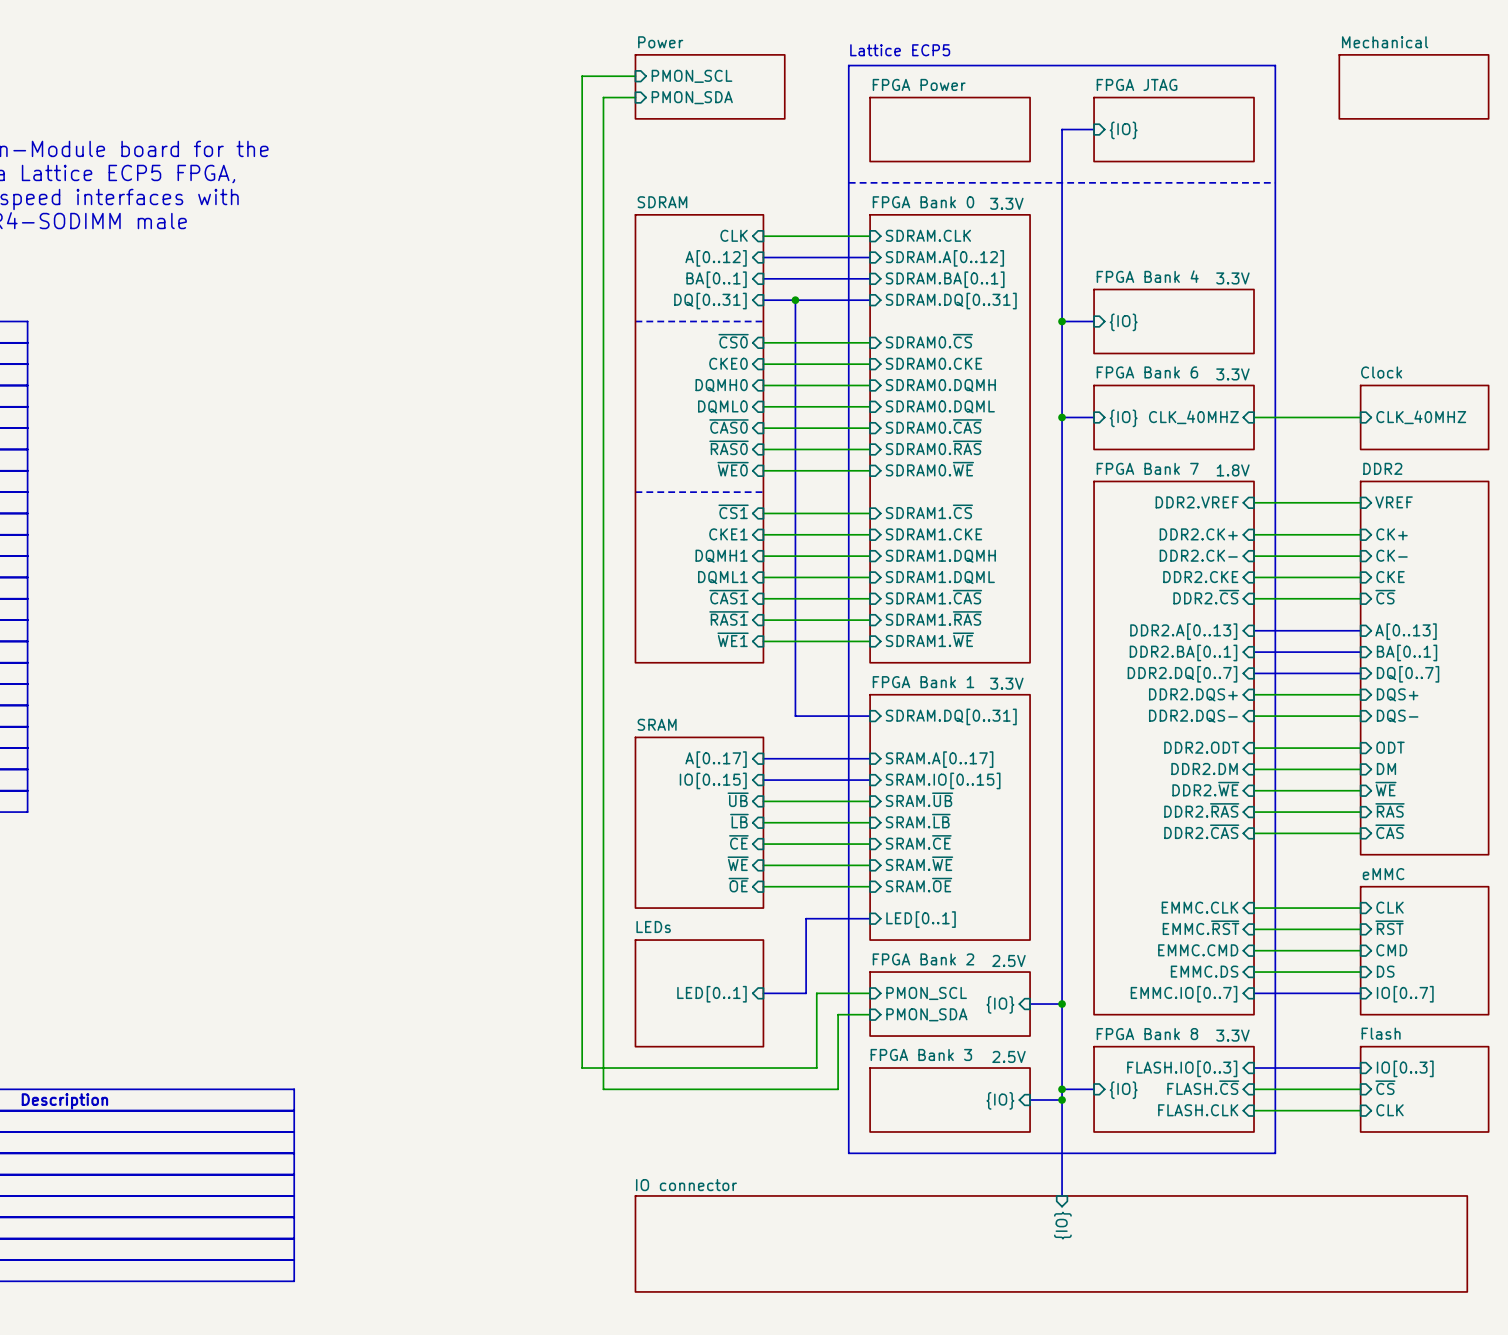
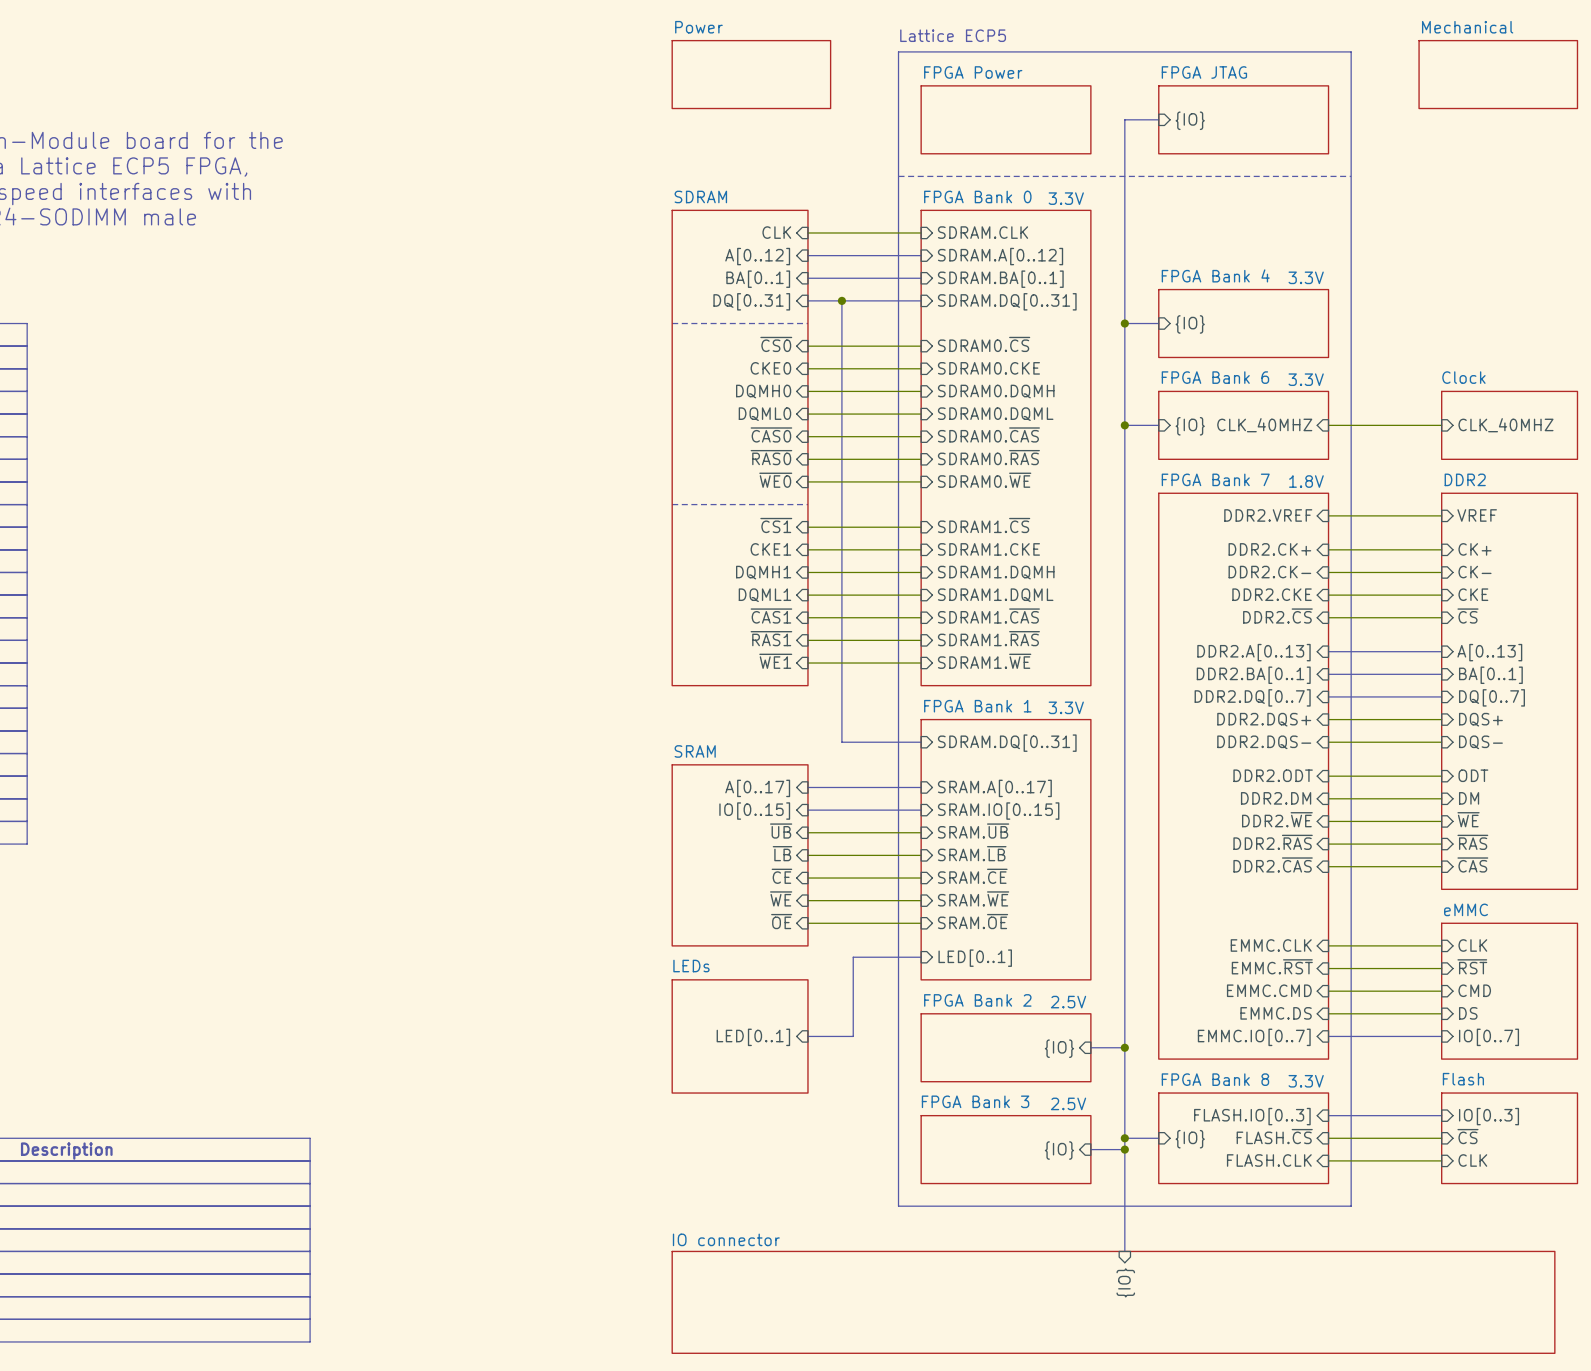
wire: (635, 76) (582, 76) (582, 1068) (816, 1068) (816, 993) (870, 993) -> none
sheet pin: PMON_SCL (692, 76) -> none
wire: (635, 97) (603, 97) (603, 1089) (838, 1089) (838, 1014) (870, 1014) -> none
sheet pin: PMON_SDA (692, 97) -> none
sheet pin: PMON_SCL (926, 993) -> none
sheet pin: PMON_SDA (926, 1014) -> none

